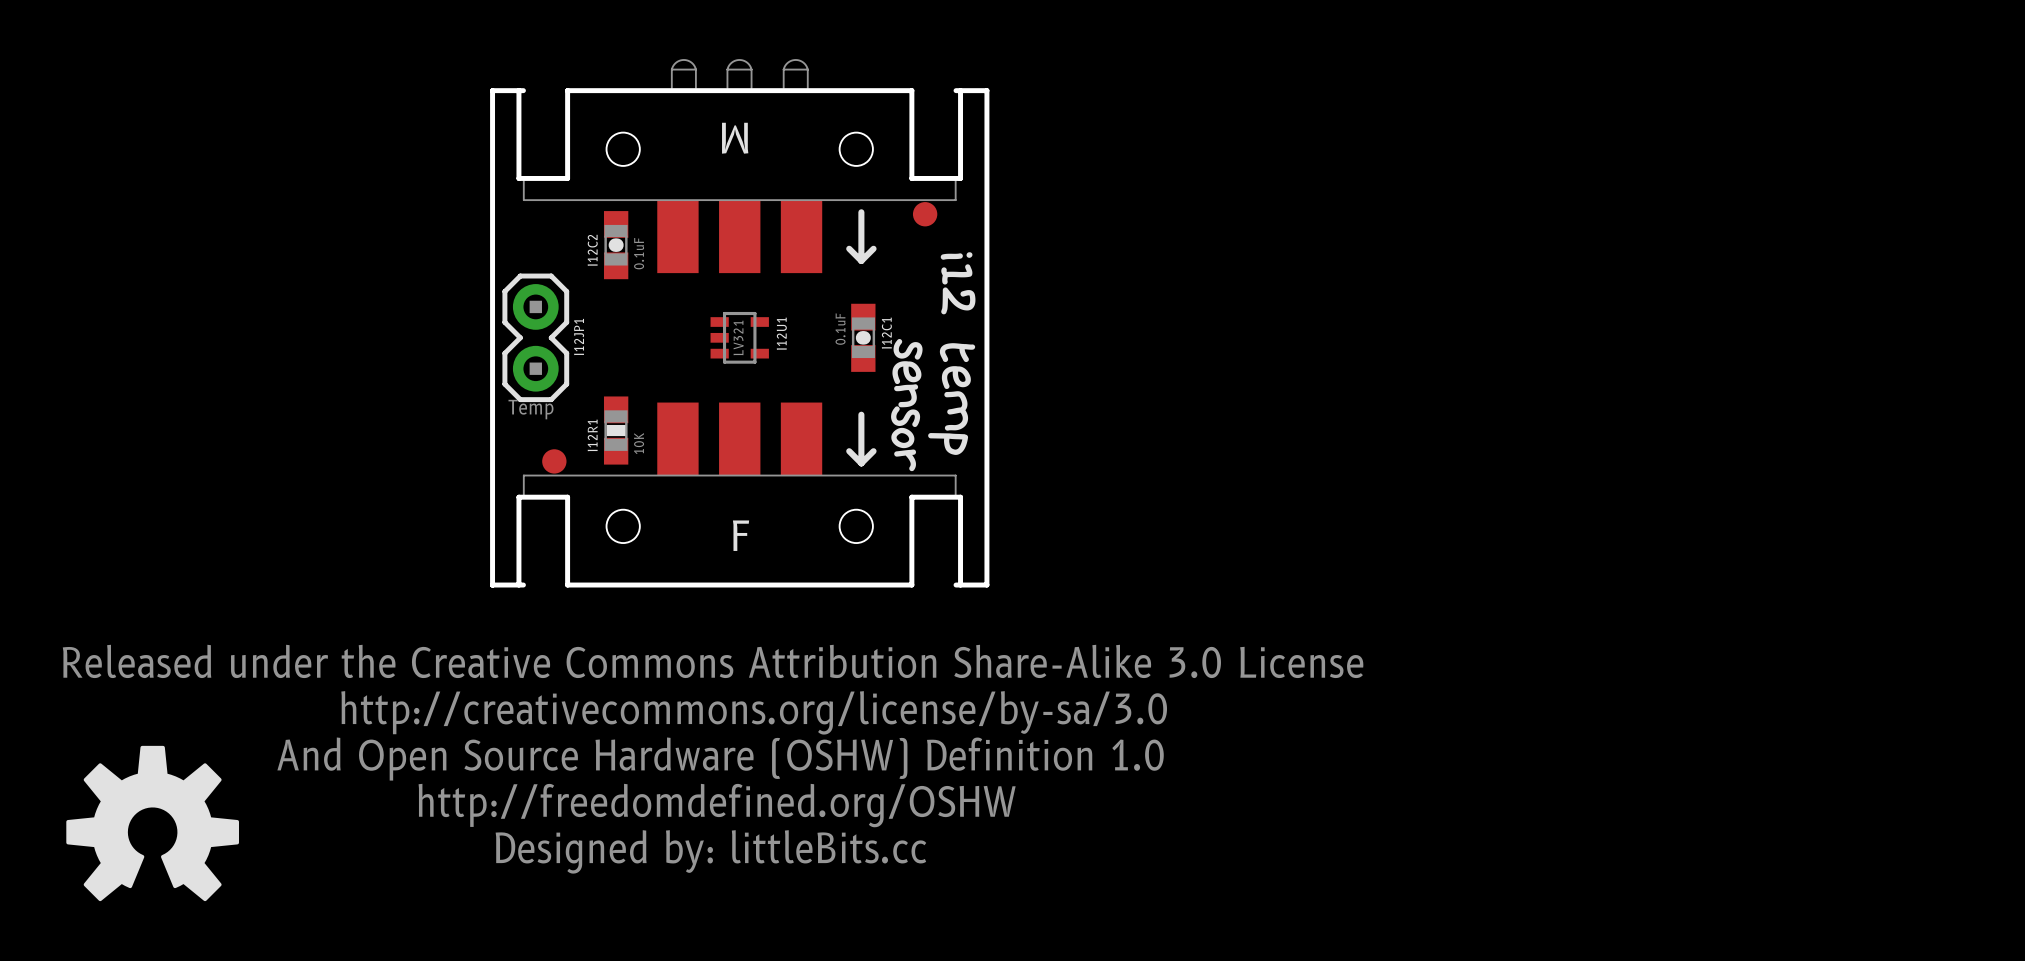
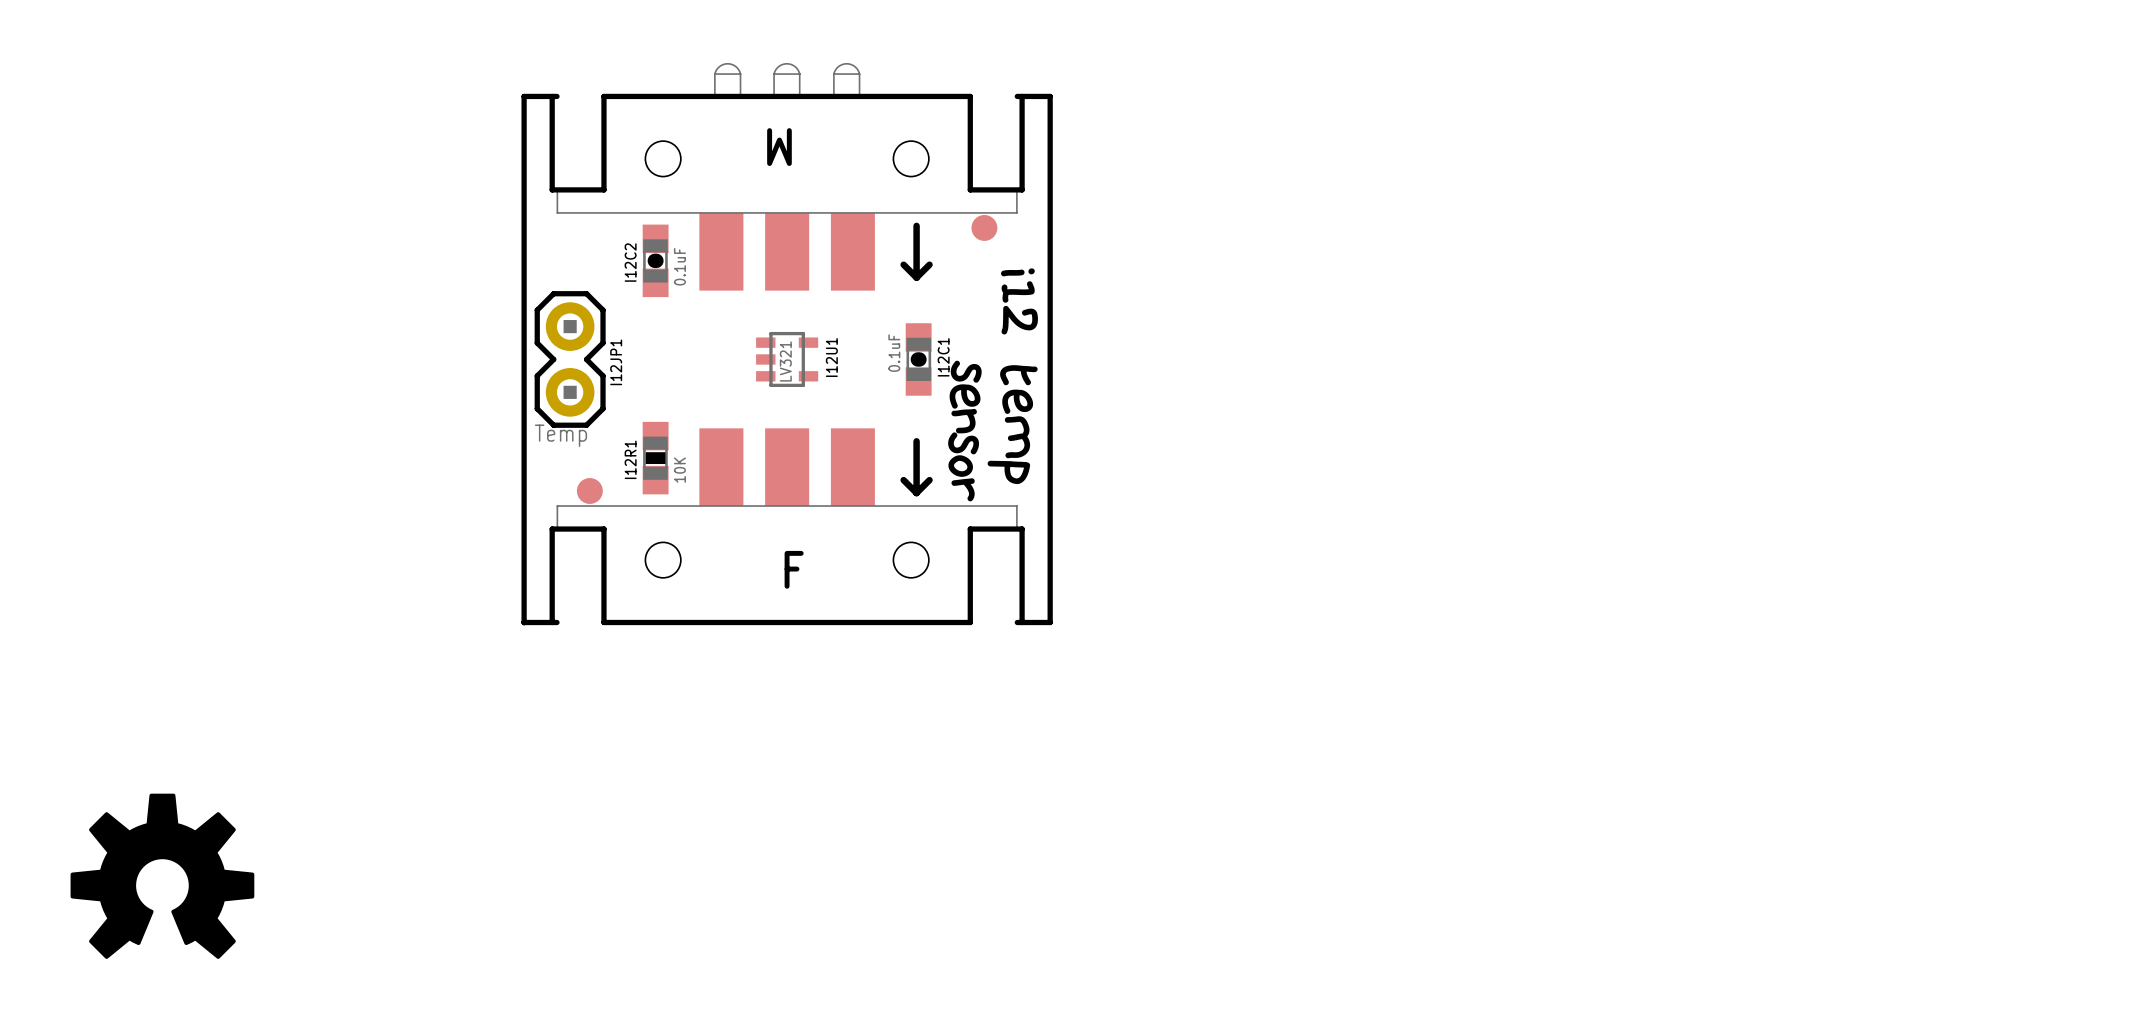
drawing: [62, 644, 1364, 874] -> none

